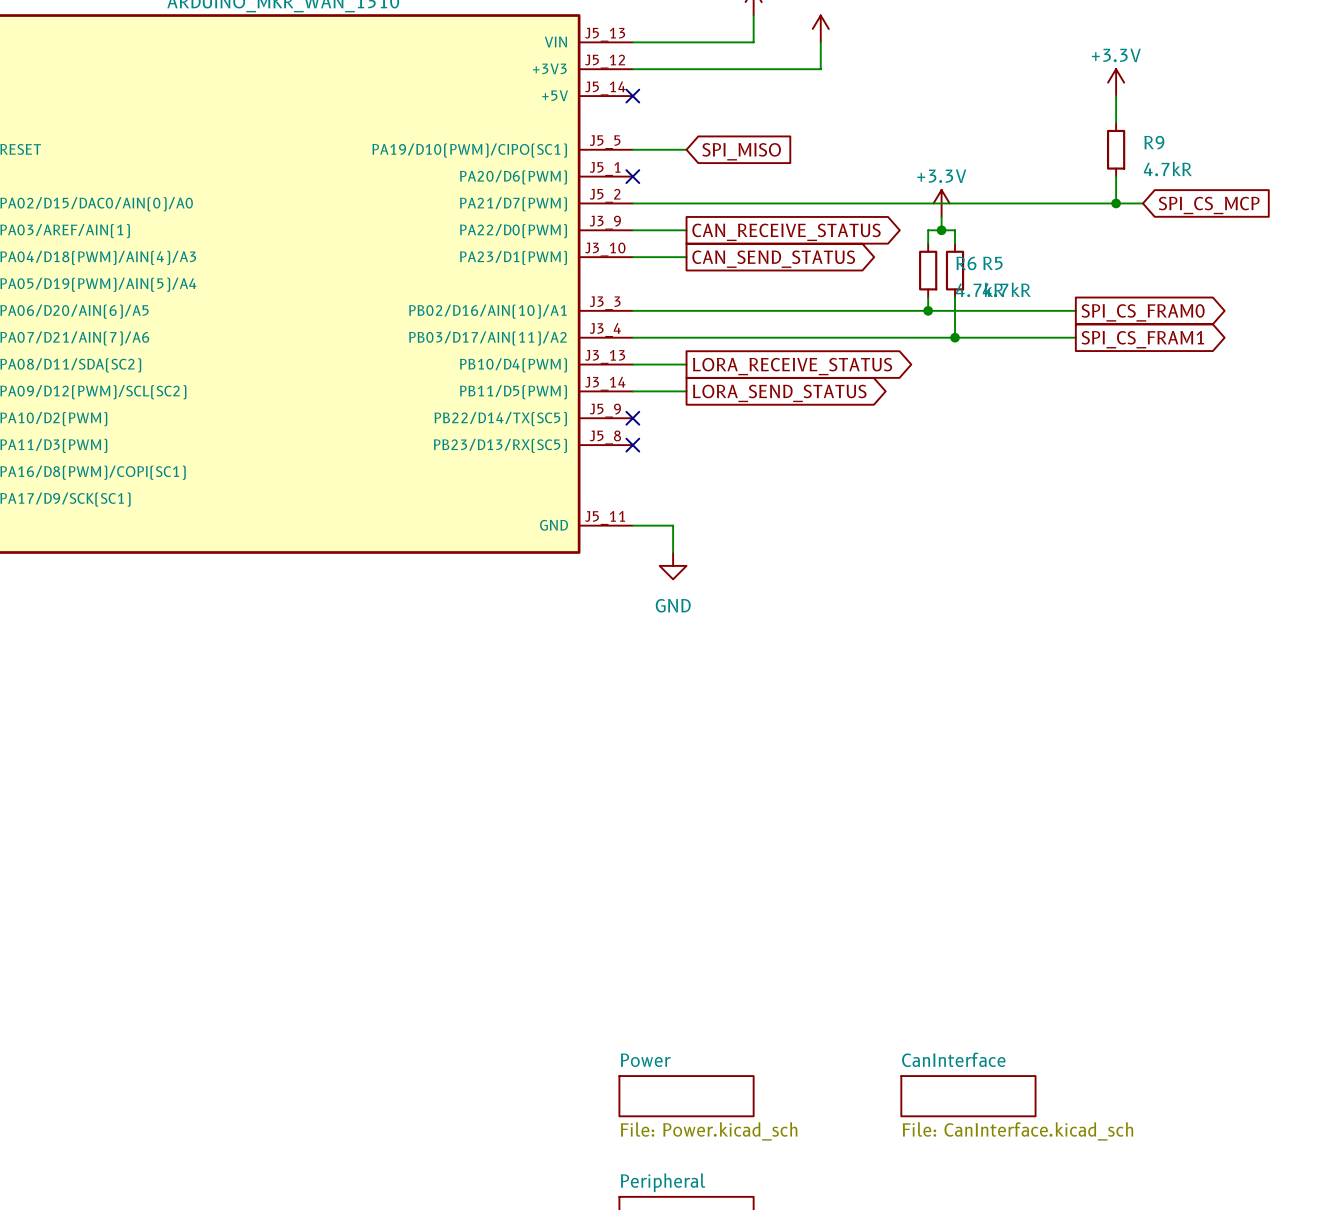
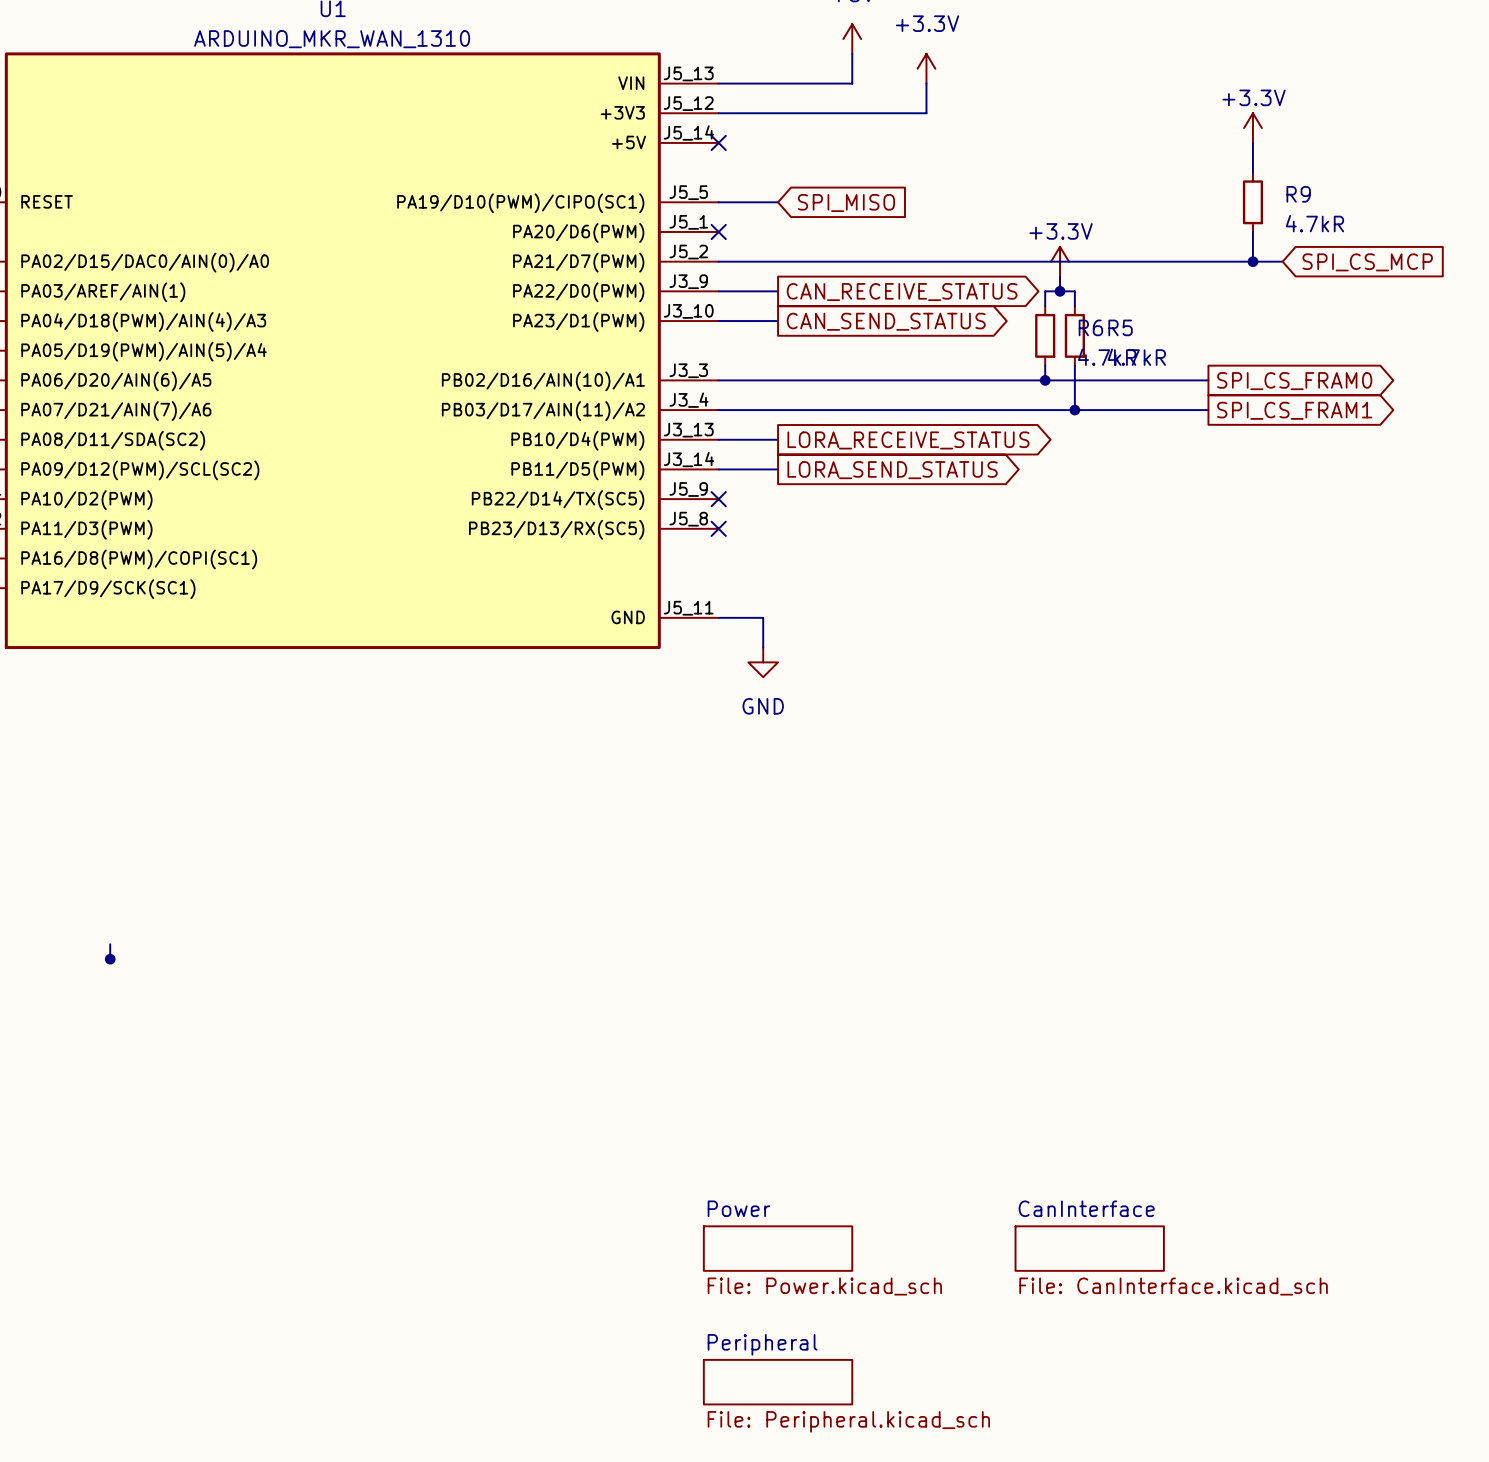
wire: none -> (110, 944) (110, 959)
junction: none -> (110, 959)

